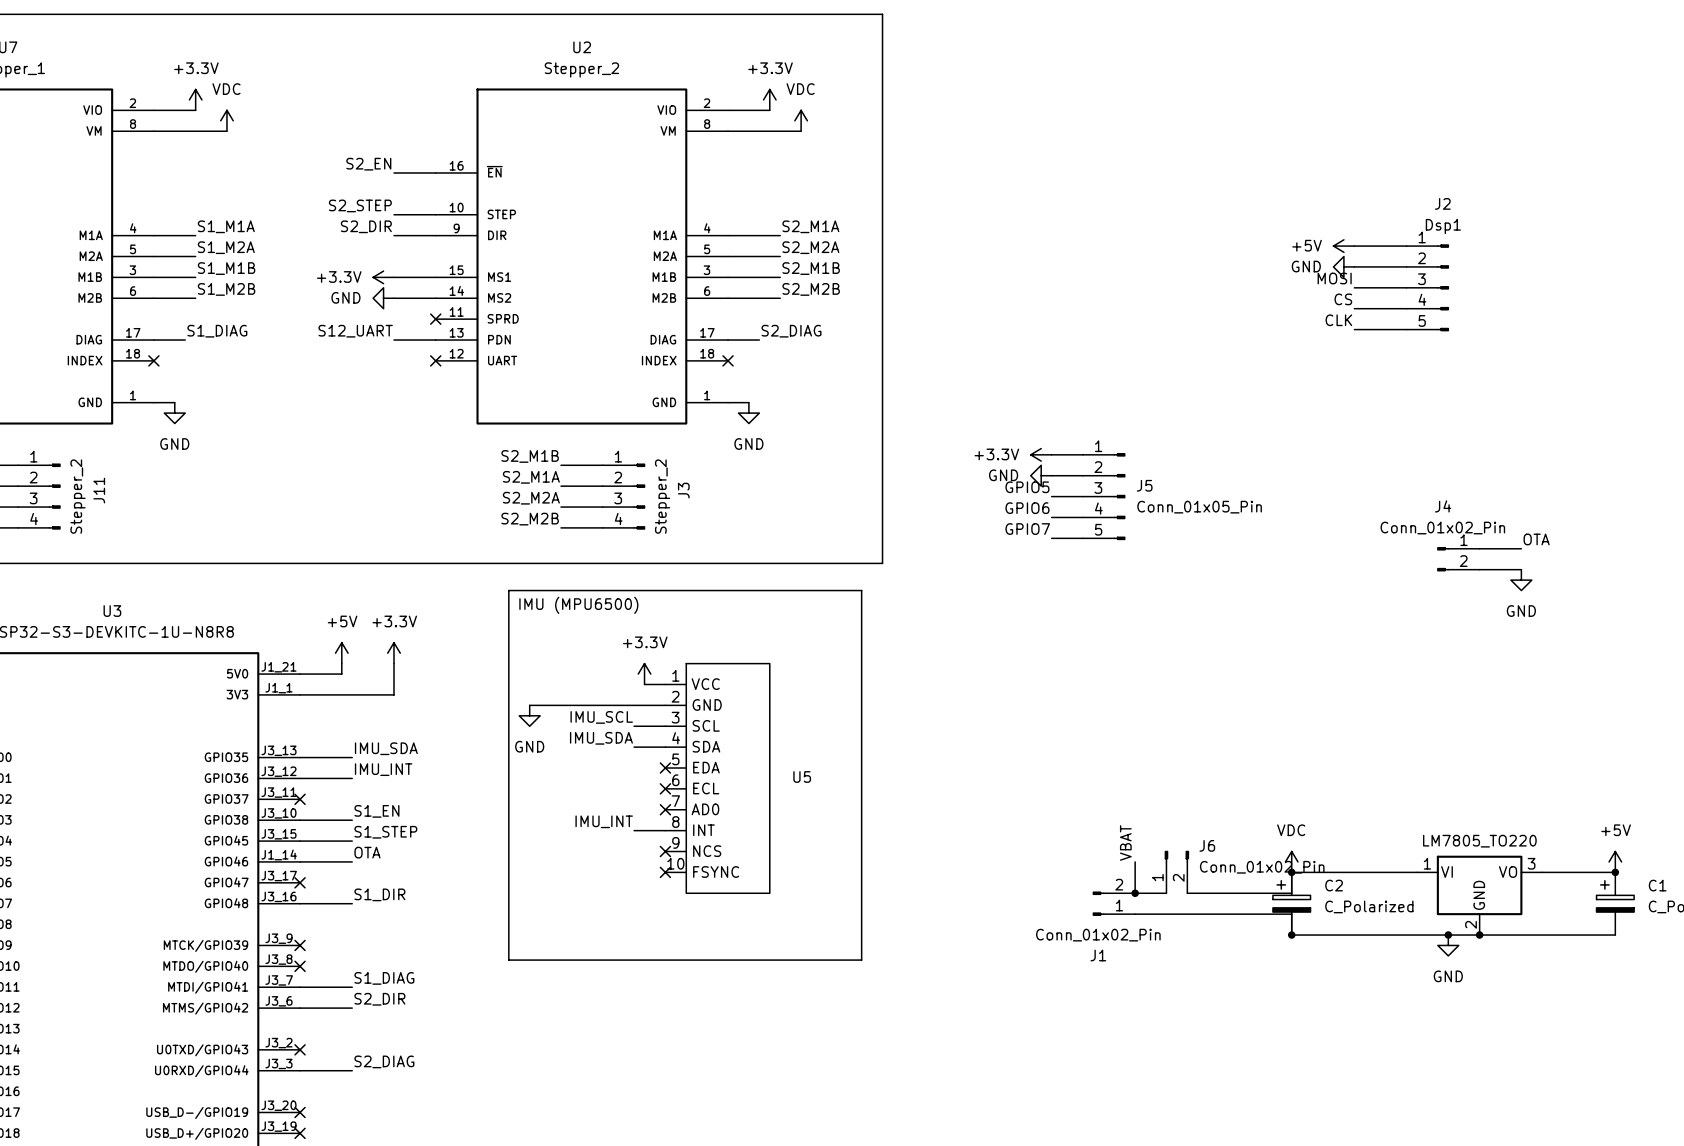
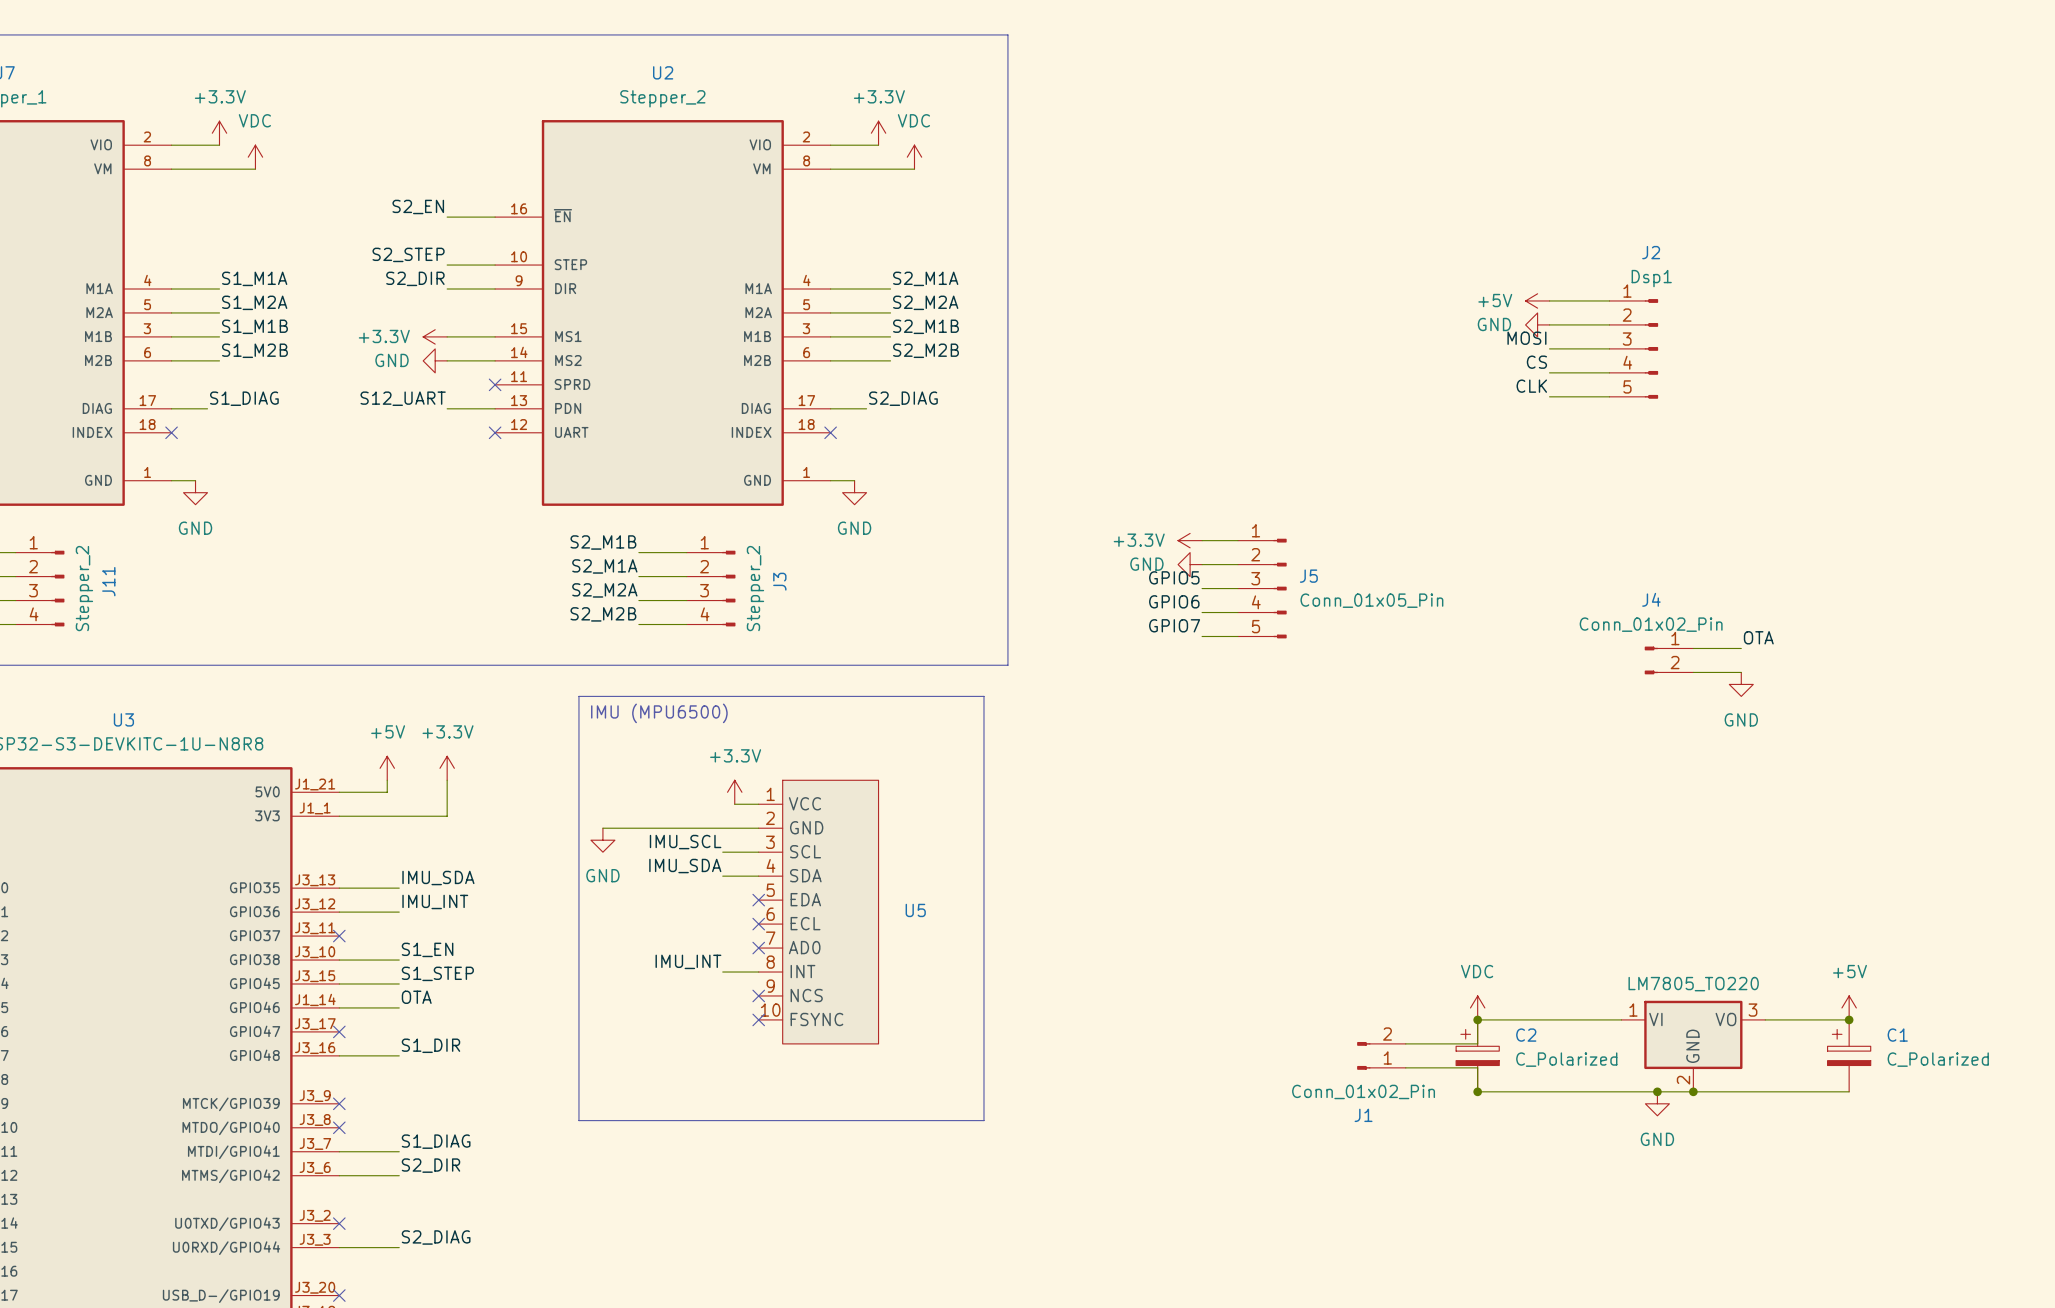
label: VBAT (1125, 842) -> none
wire: (1135, 861) (1135, 893) (1166, 893) -> none
J6: Conn_01x02_Pin (1176, 872) -> none
junction: (1135, 893) -> none
J1 position: (1113, 903) -> (1381, 1055)
wire: (1135, 914) (1229, 914) -> none

